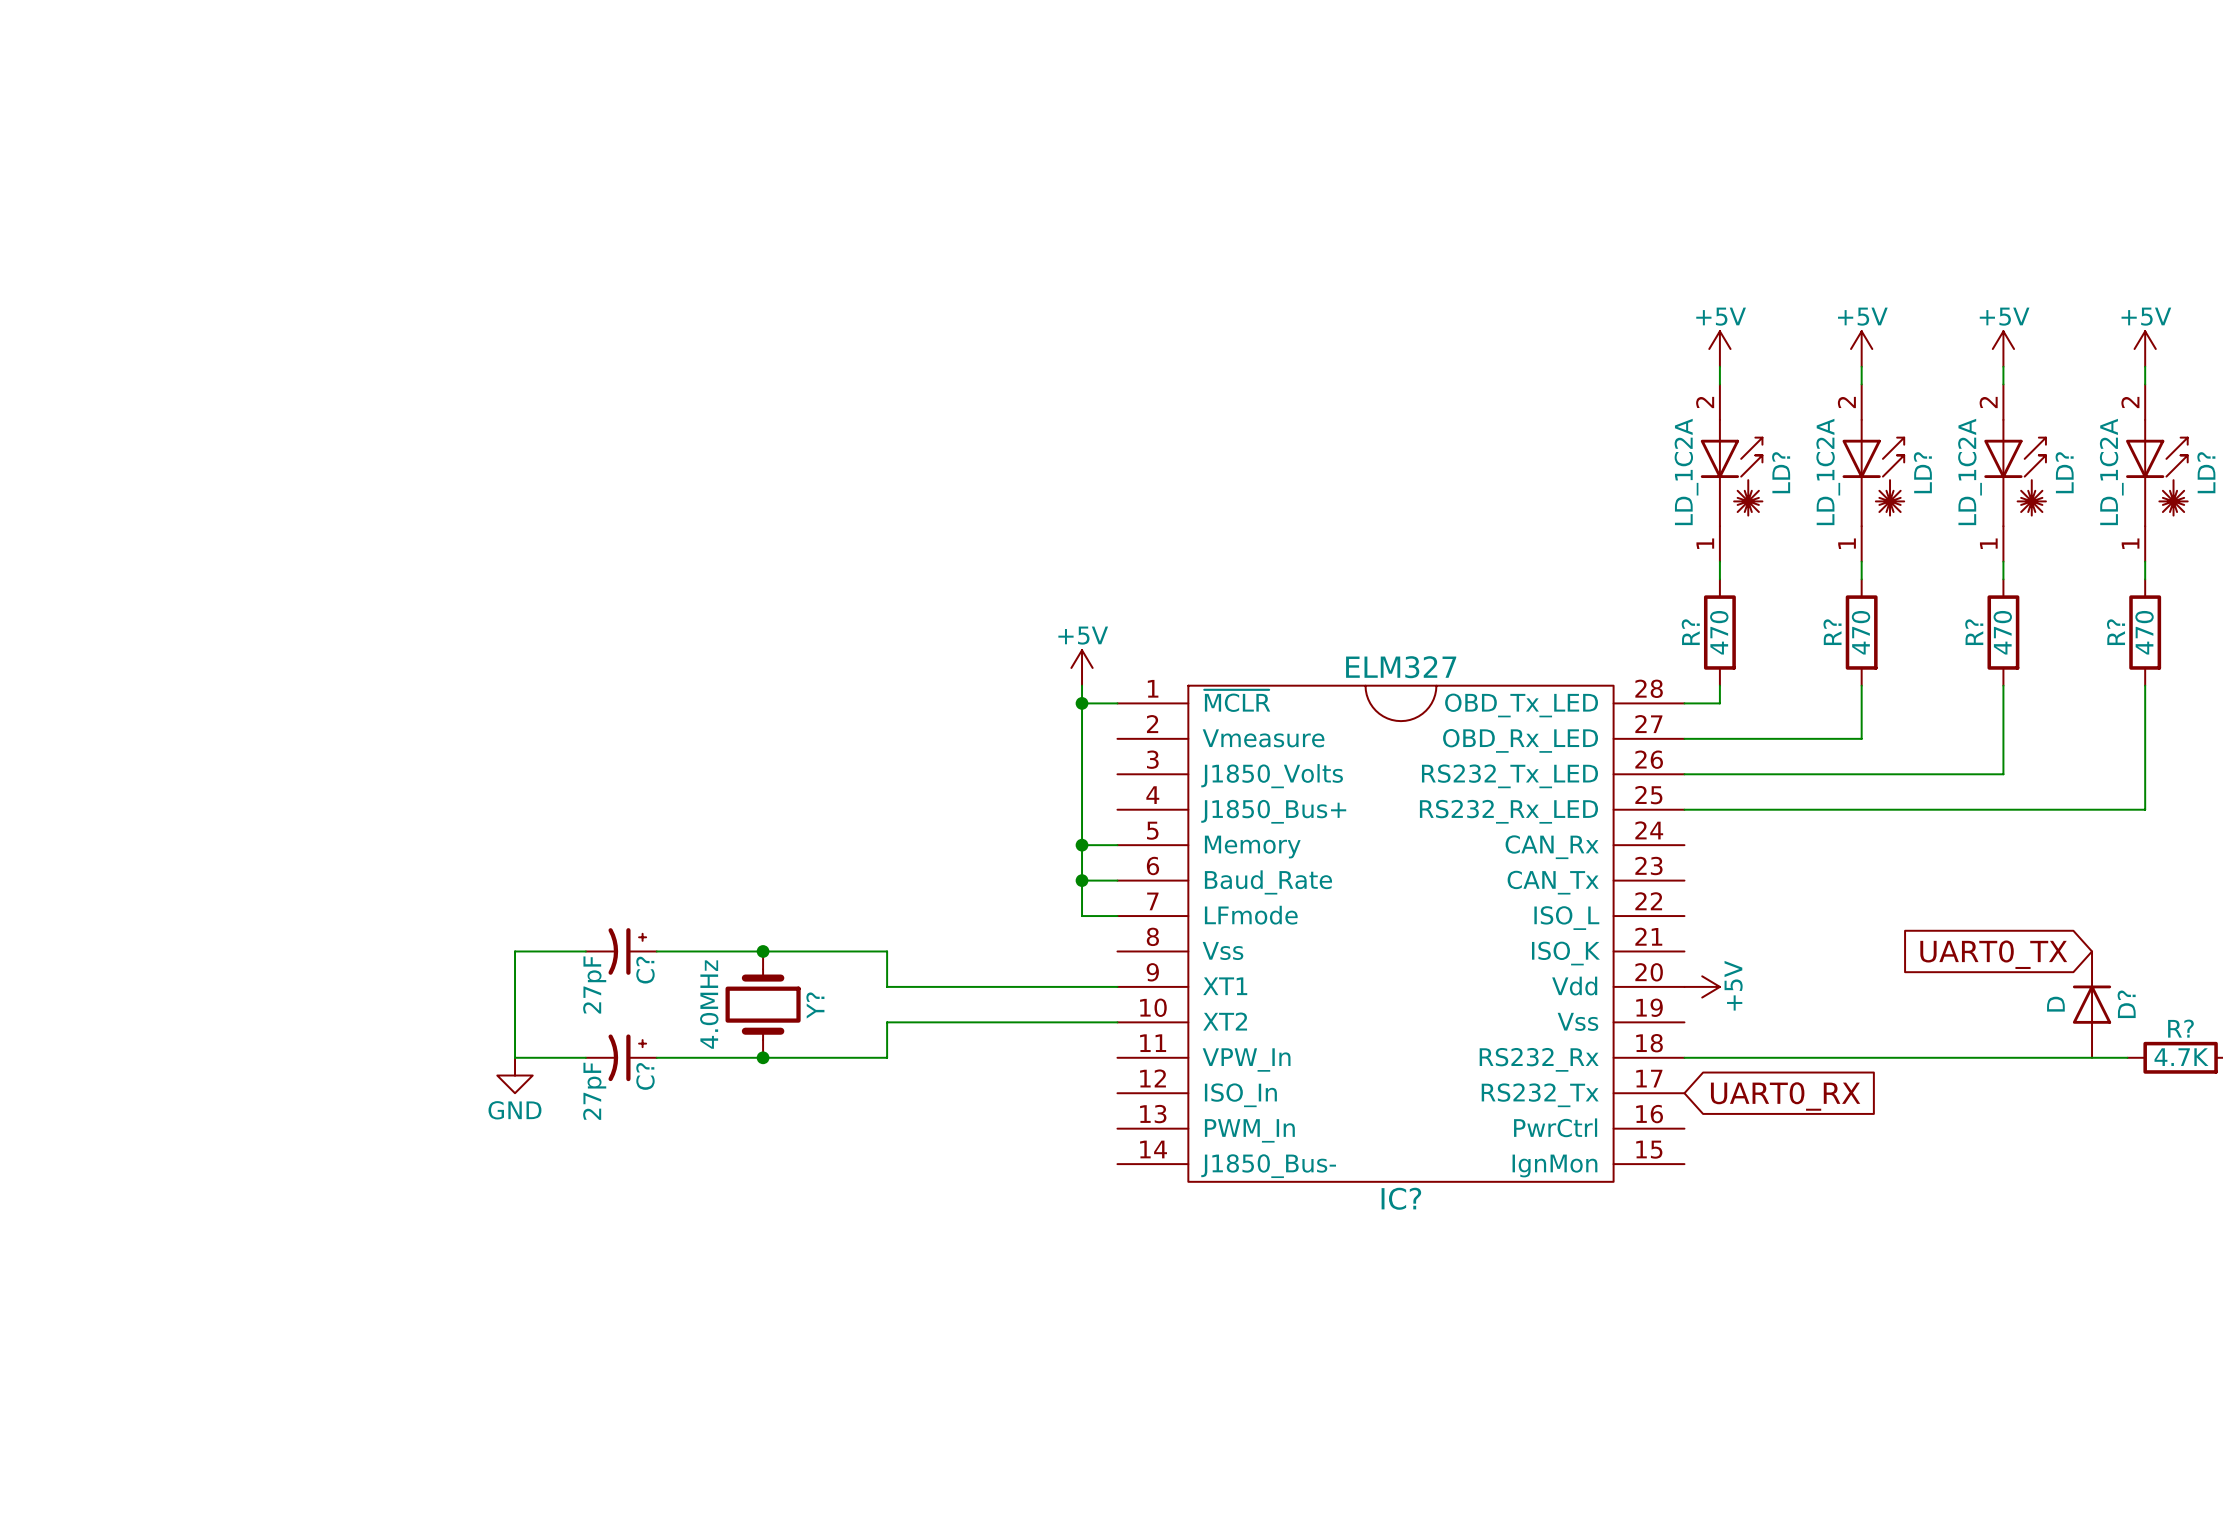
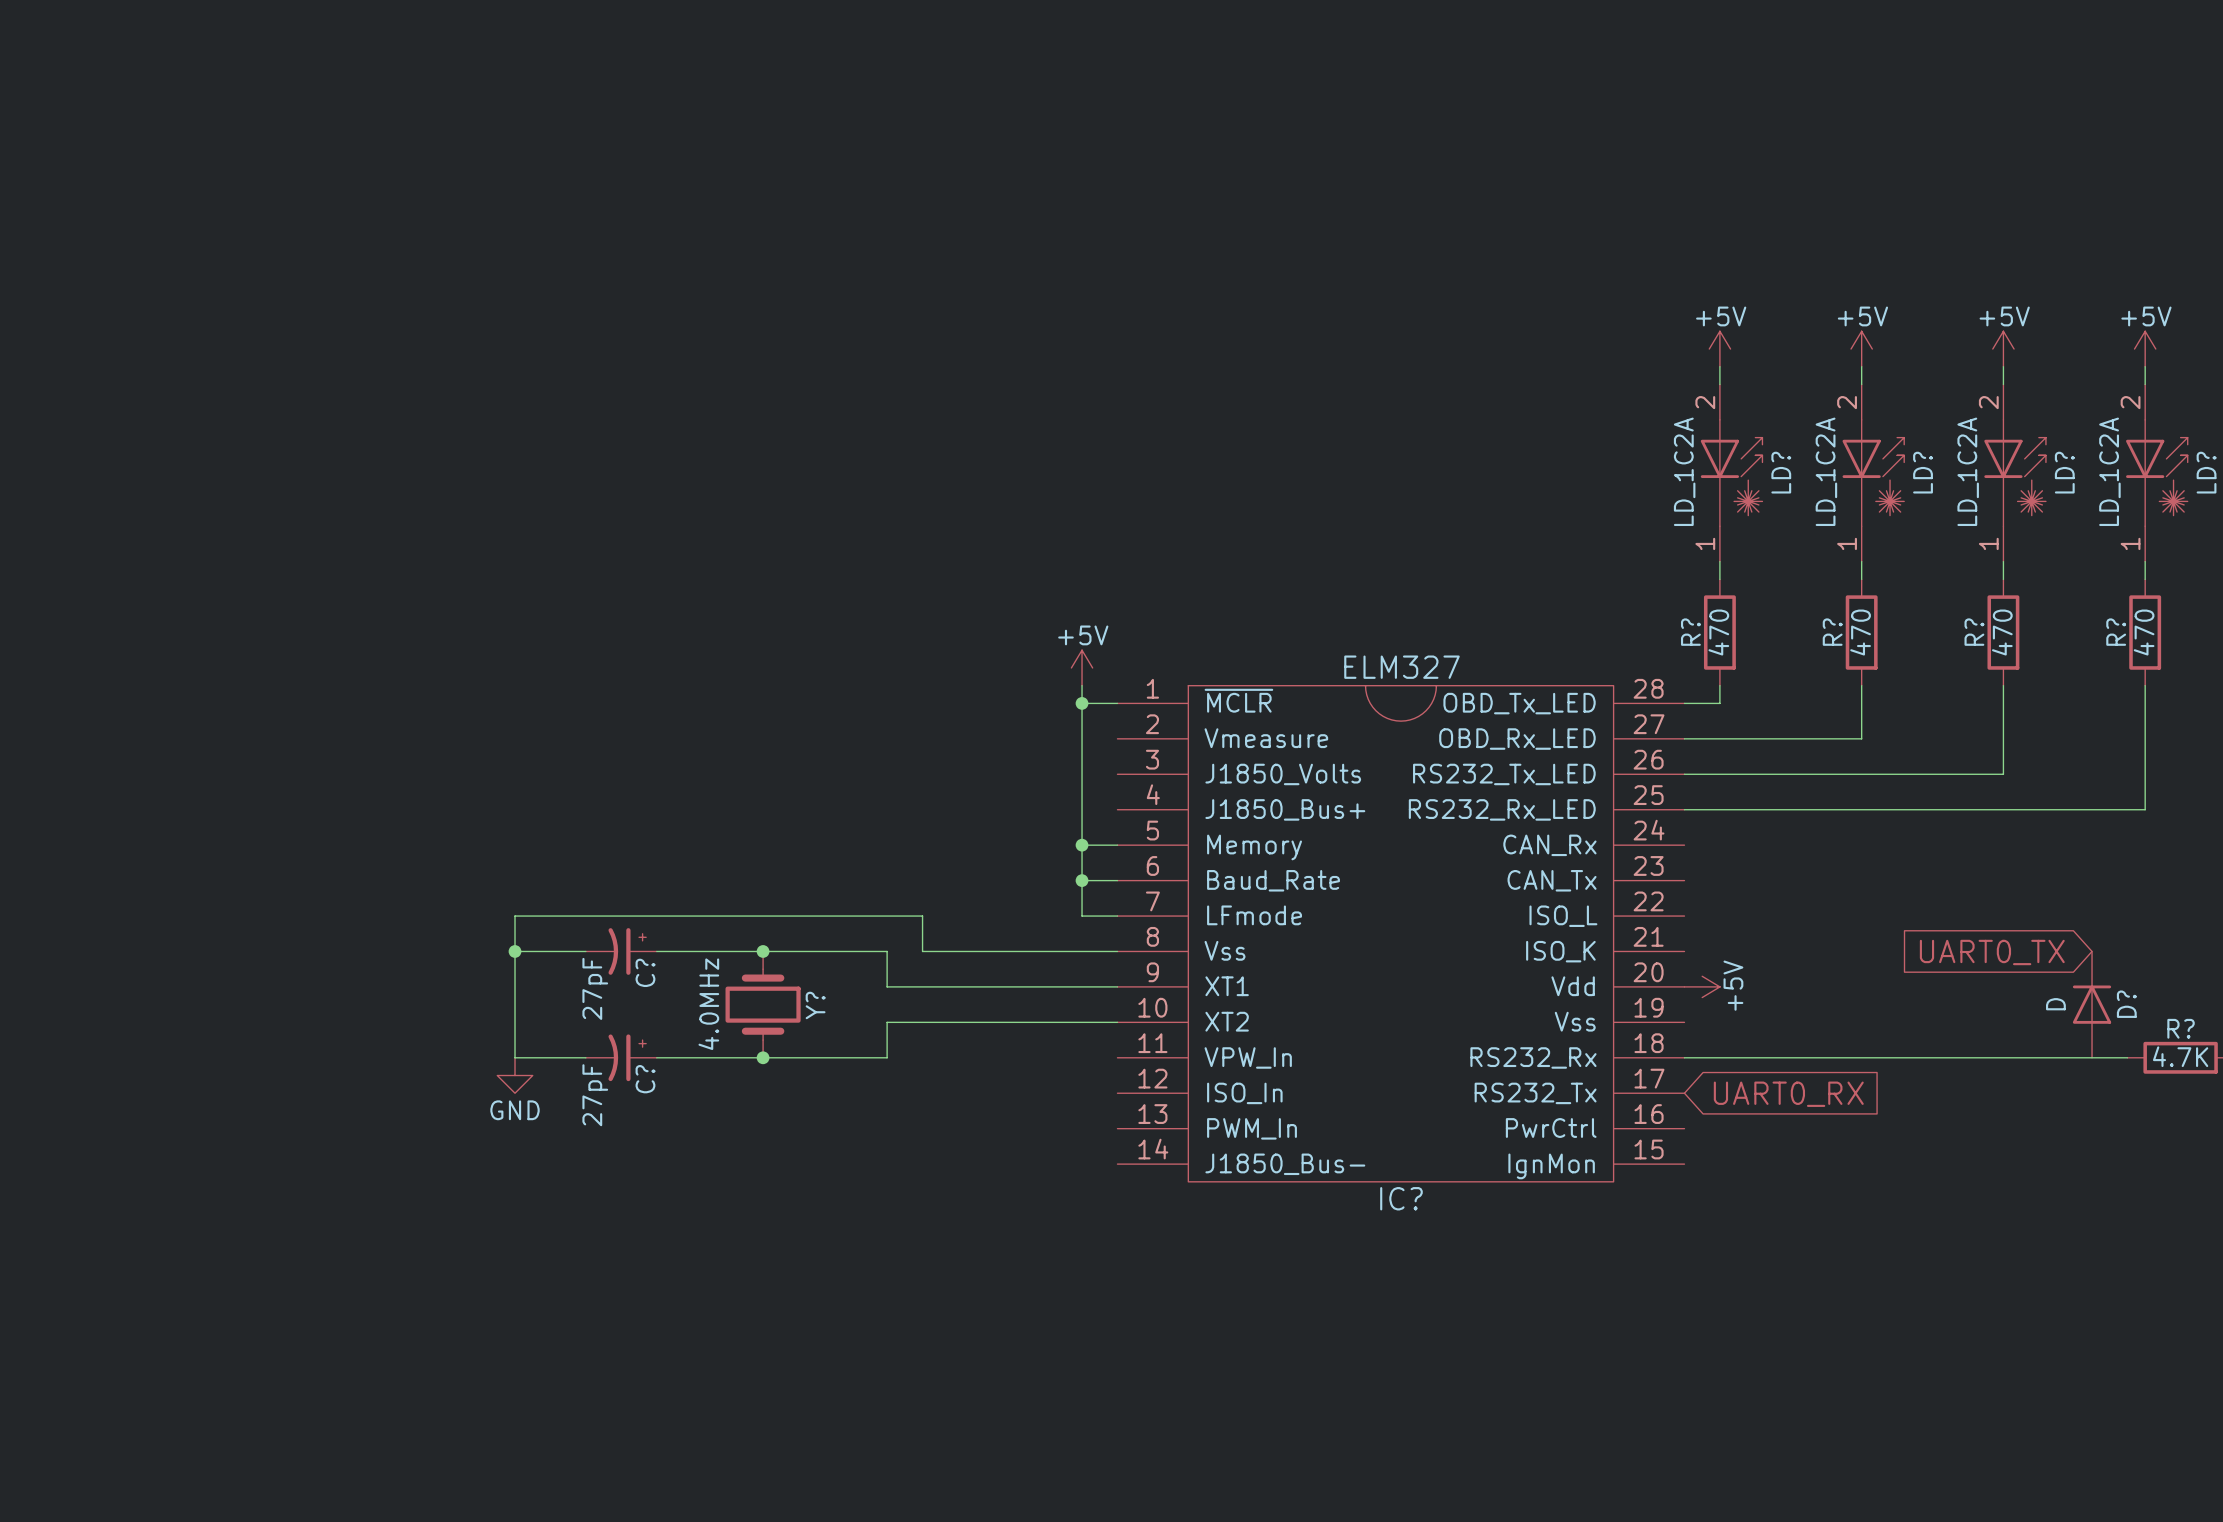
wire: none -> (515, 951) (515, 916) (922, 916) (922, 951) (1117, 951)
junction: none -> (515, 951)

